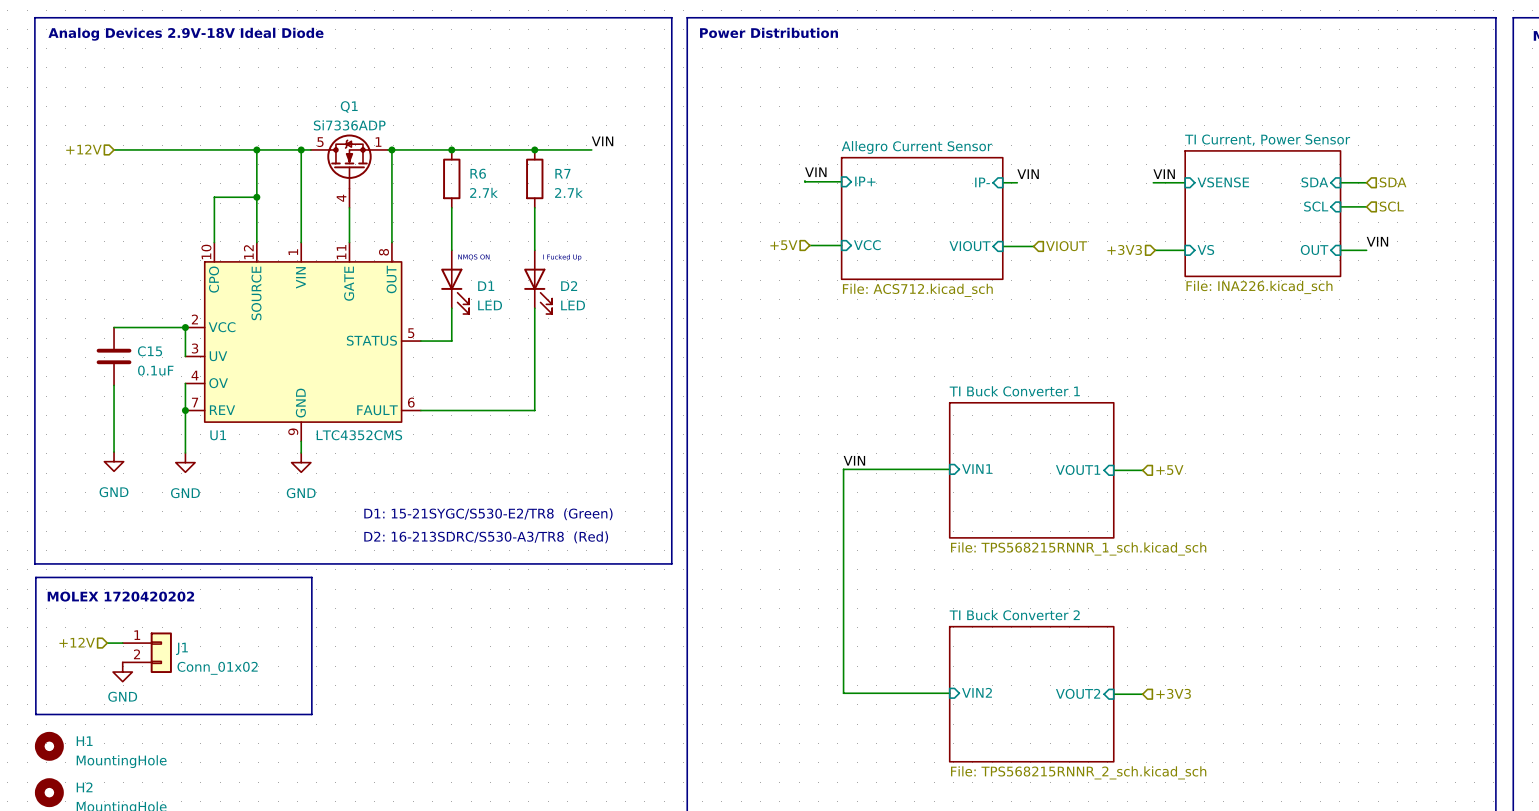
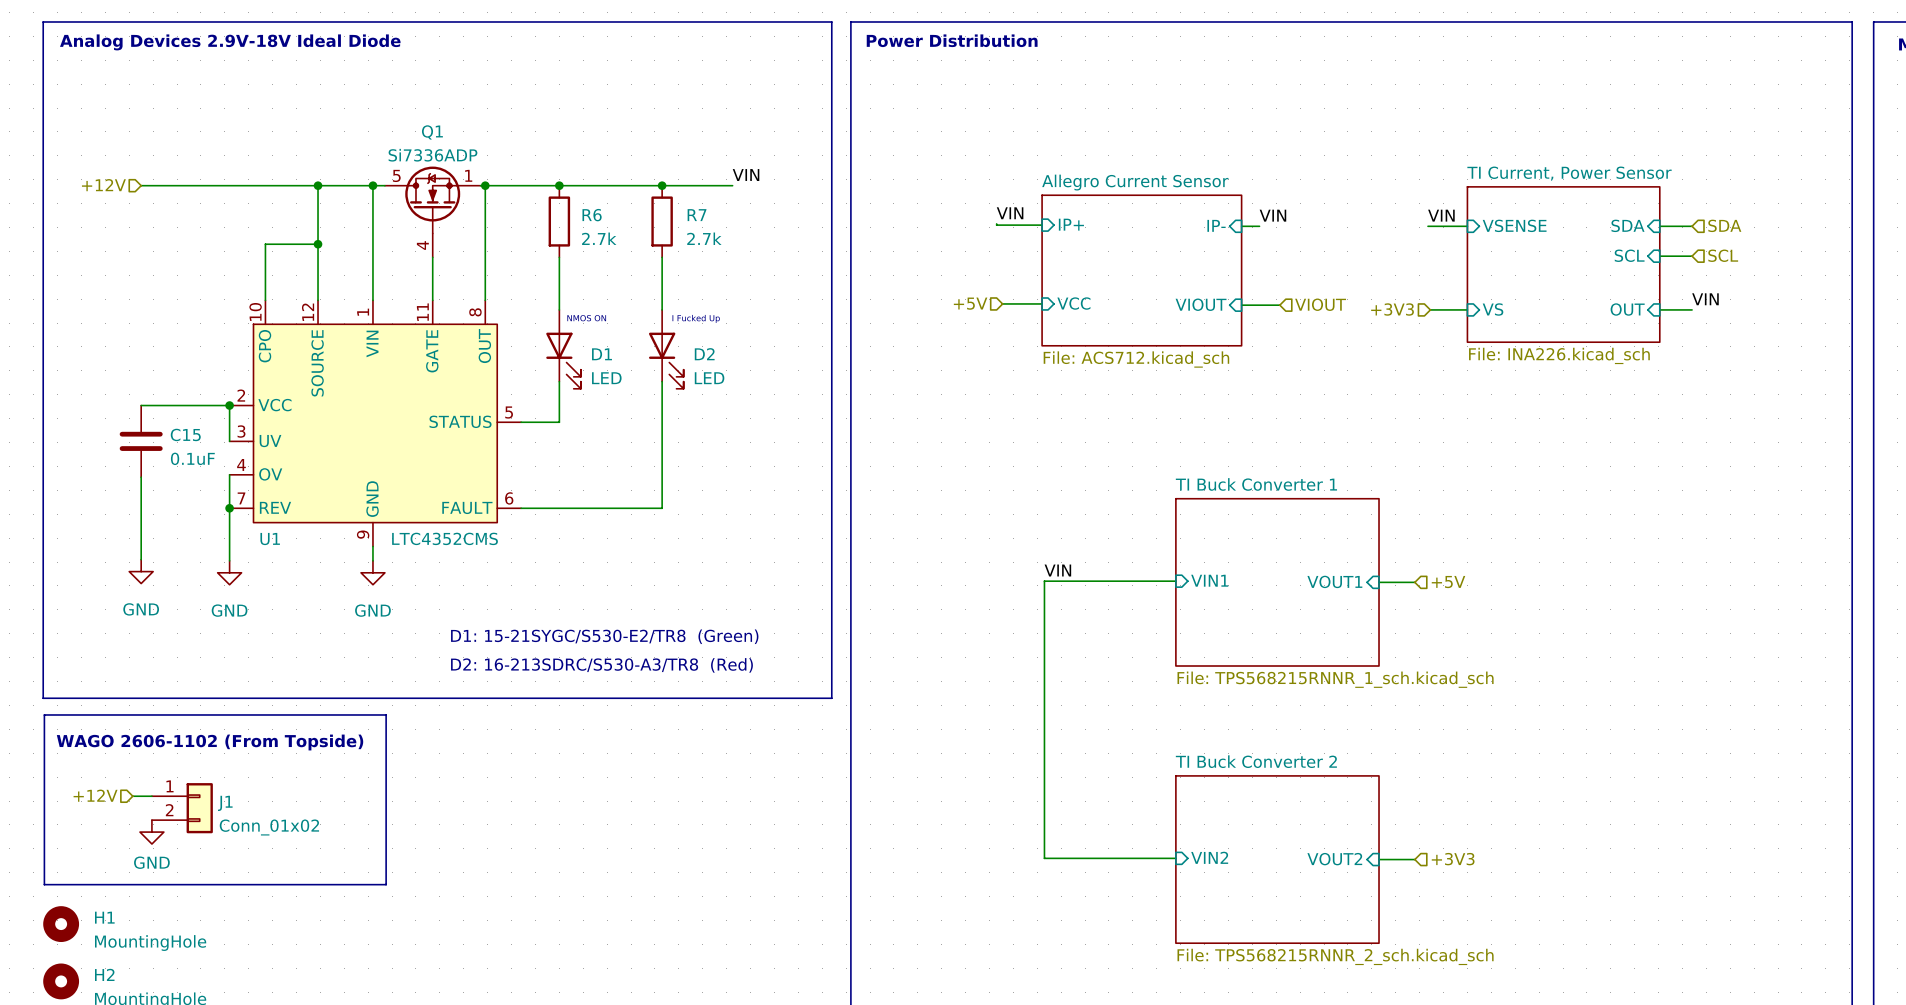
text: MOLEX 1720420202 (120, 596) -> WAGO 2606-1102 (From Topside) (210, 742)

